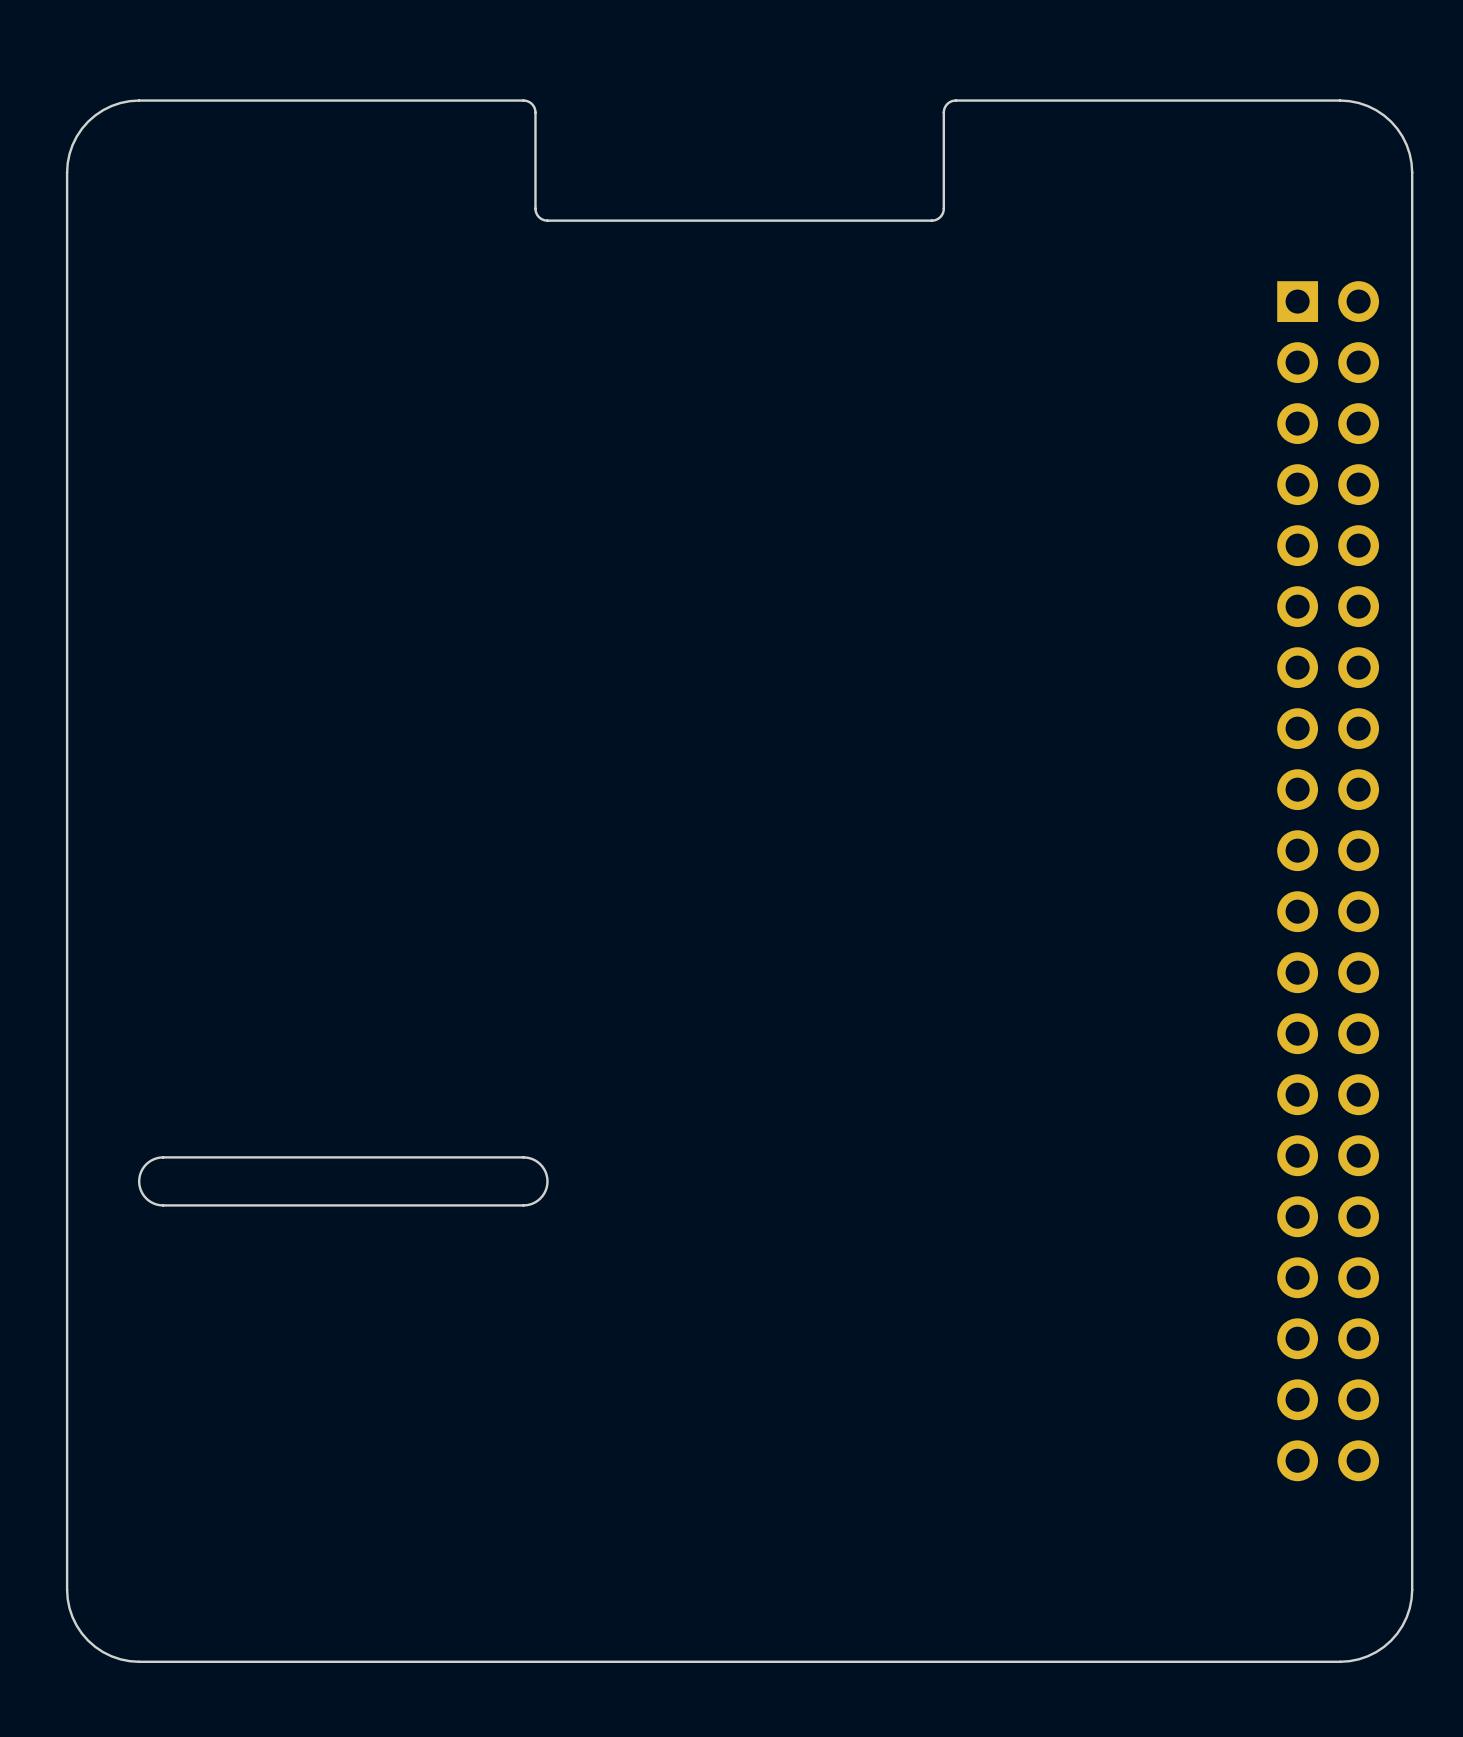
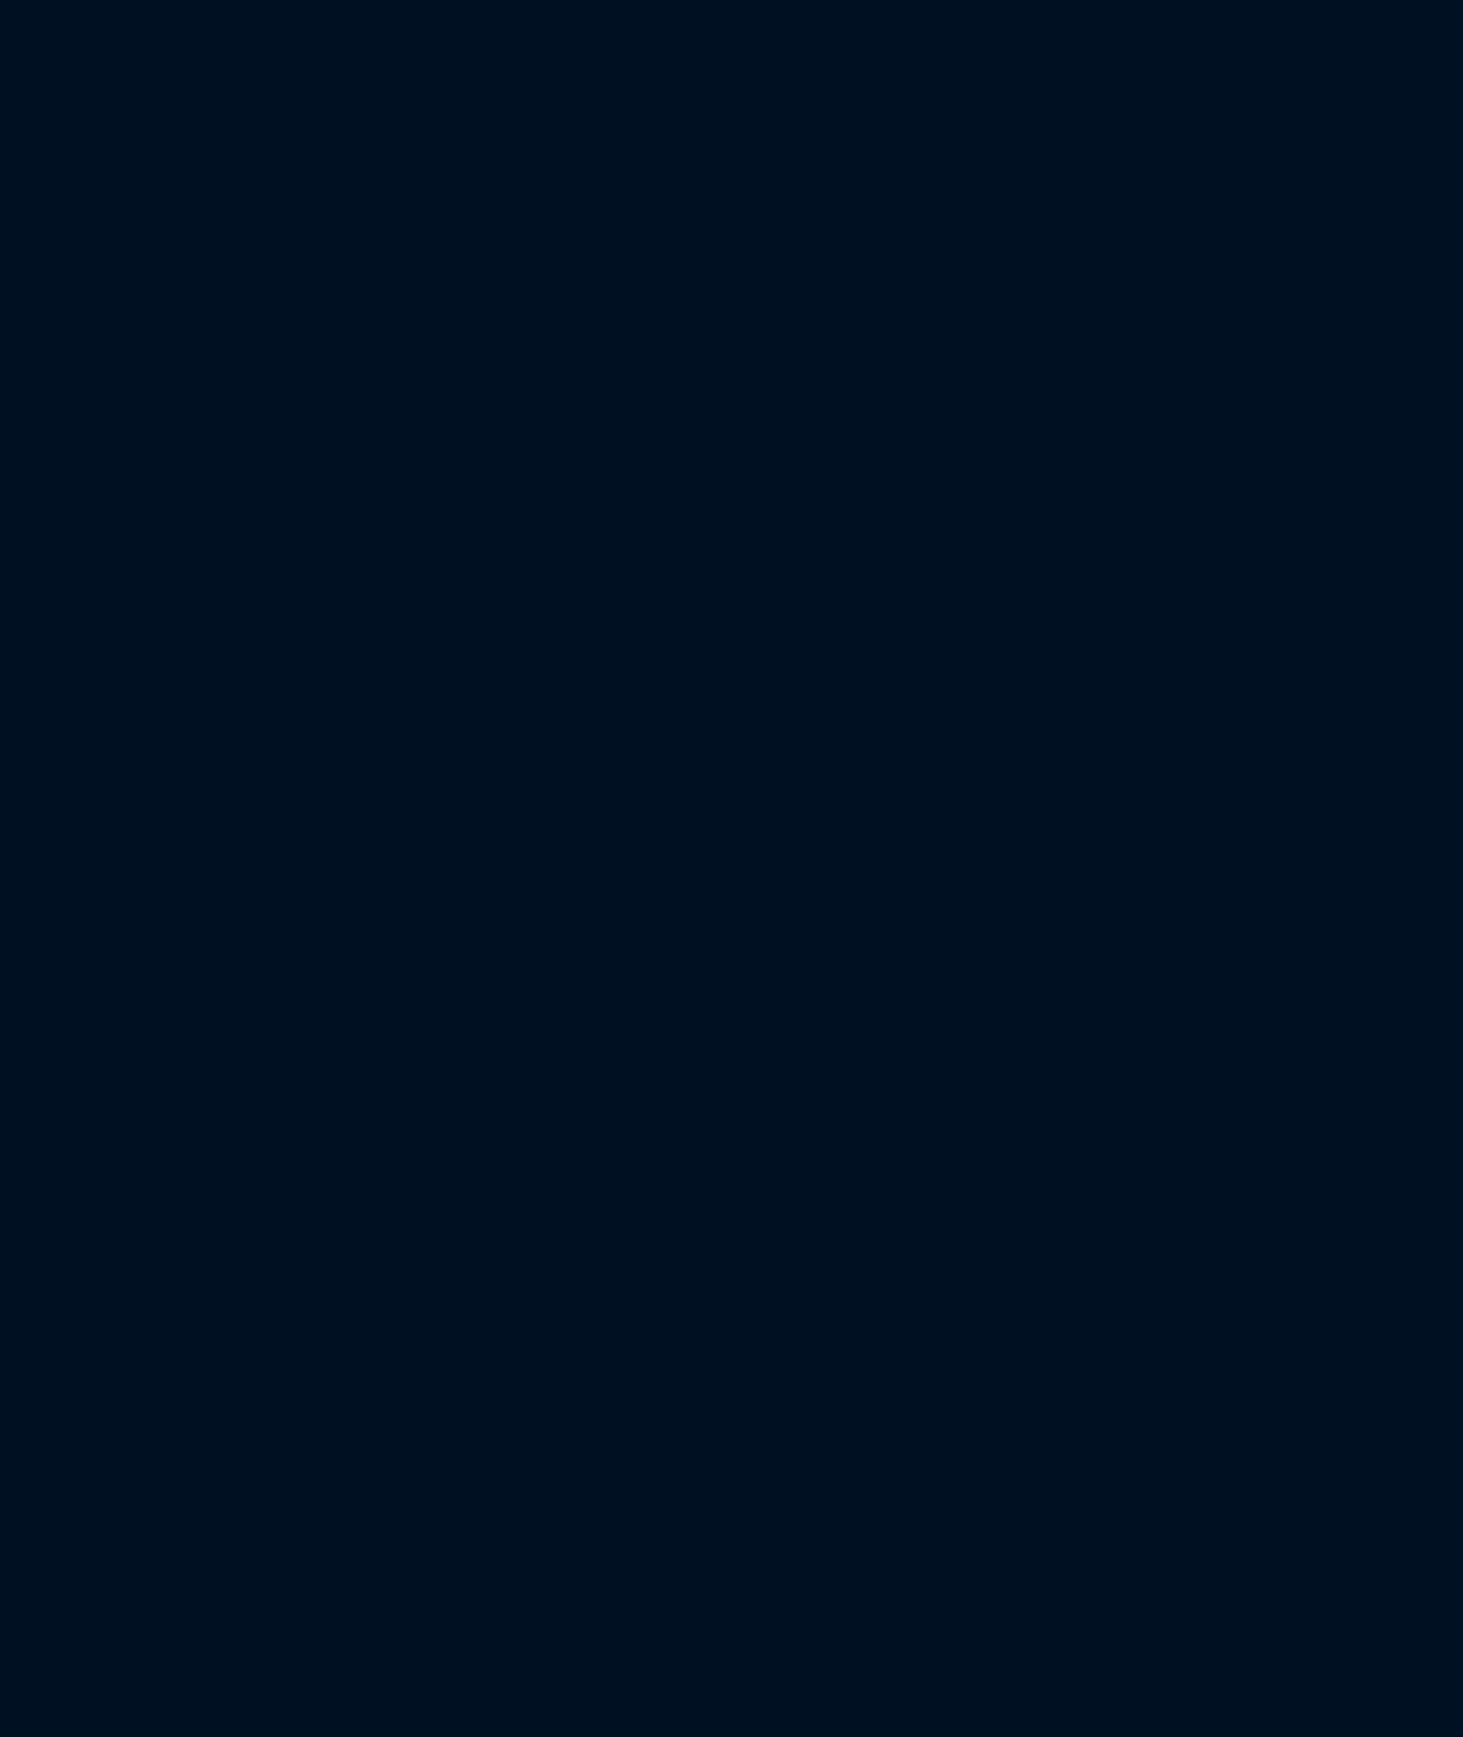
board edge: (139, 100) (526, 100) (532, 105) (535, 110) (535, 210) (540, 218) (547, 220) (934, 220) (940, 217) (943, 210) (943, 110) (947, 104) (954, 100) (1340, 100) (1367, 106) (1383, 115) (1397, 128) (1409, 153) (1412, 172) (1412, 1589) (1409, 1608) (1402, 1625) (1383, 1646) (1367, 1656) (1340, 1661) (139, 1661) (111, 1656) (95, 1646) (81, 1633) (69, 1608) (67, 1589) (67, 172) (72, 145) (88, 121) (111, 106) (139, 100) -> none
part: (1328, 881) -> none
board edge: (163, 1157) (526, 1157) (535, 1160) (542, 1166) (546, 1175) (547, 1184) (544, 1193) (538, 1200) (523, 1205) (160, 1205) (151, 1202) (144, 1196) (139, 1187) (139, 1178) (142, 1169) (148, 1162) (163, 1157) -> none

